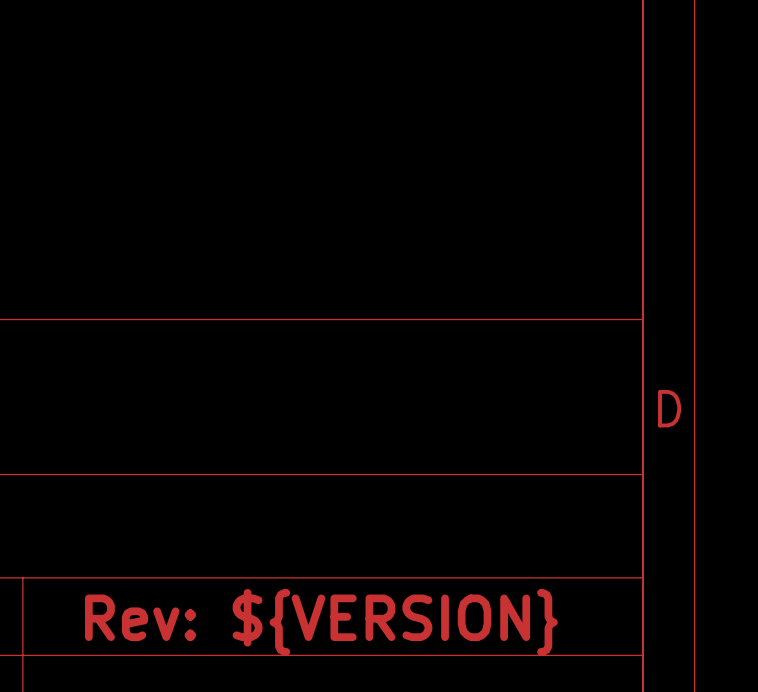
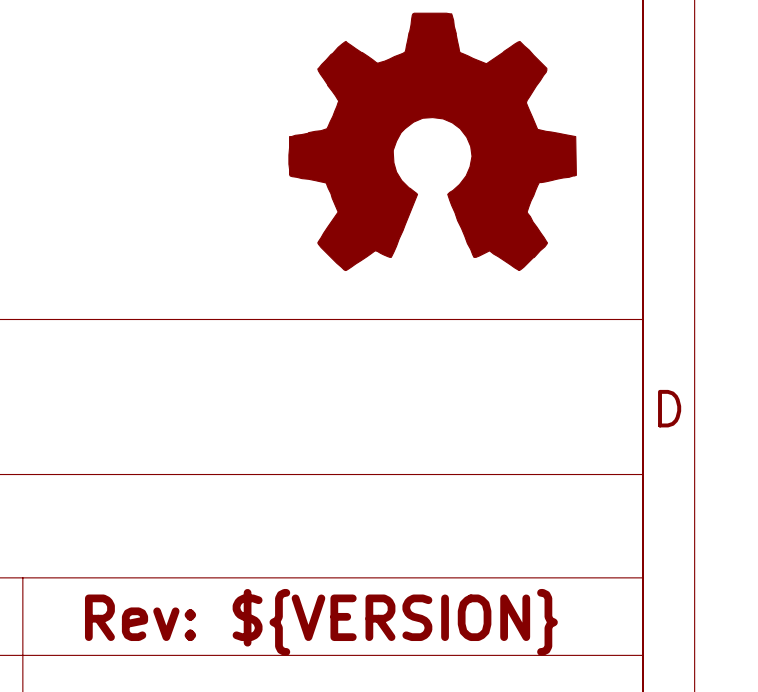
power symbol: none -> (432, 141)

